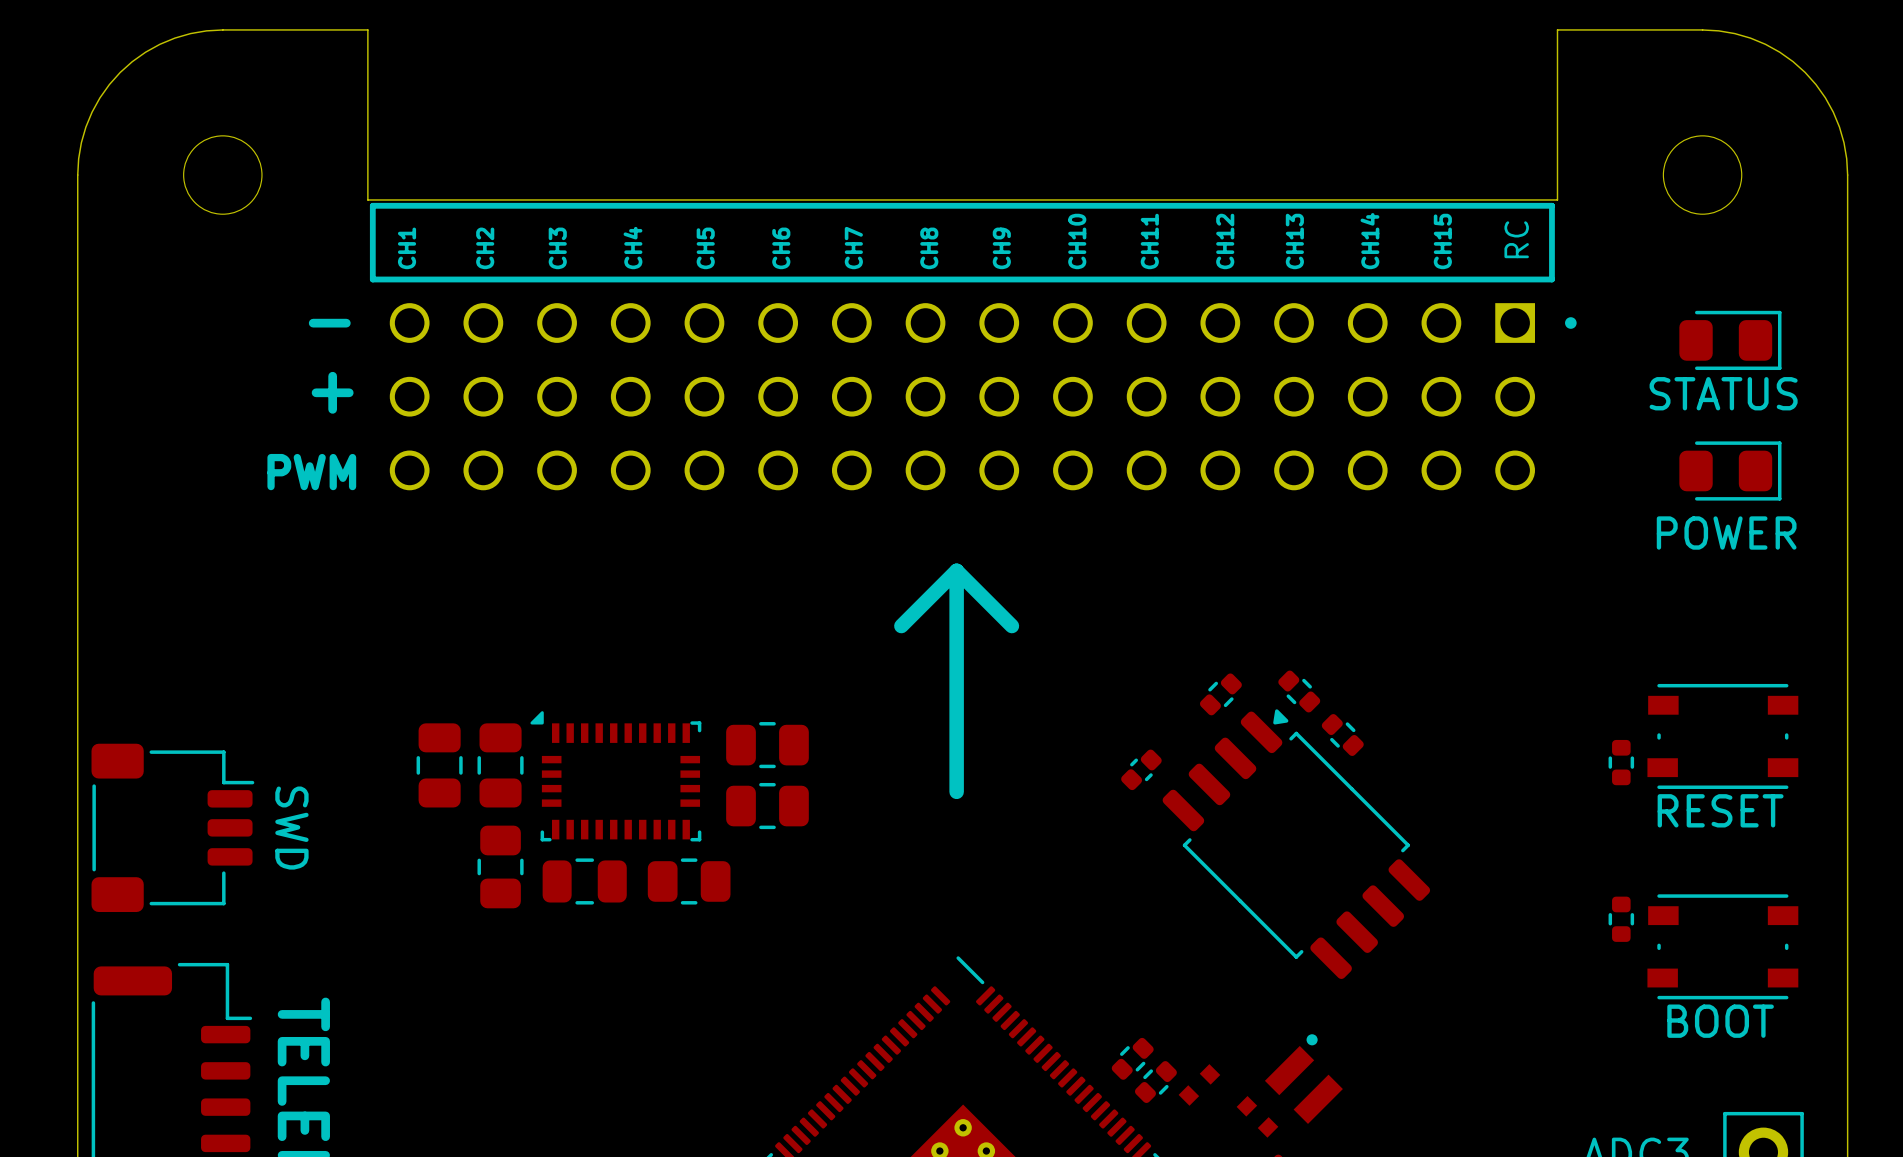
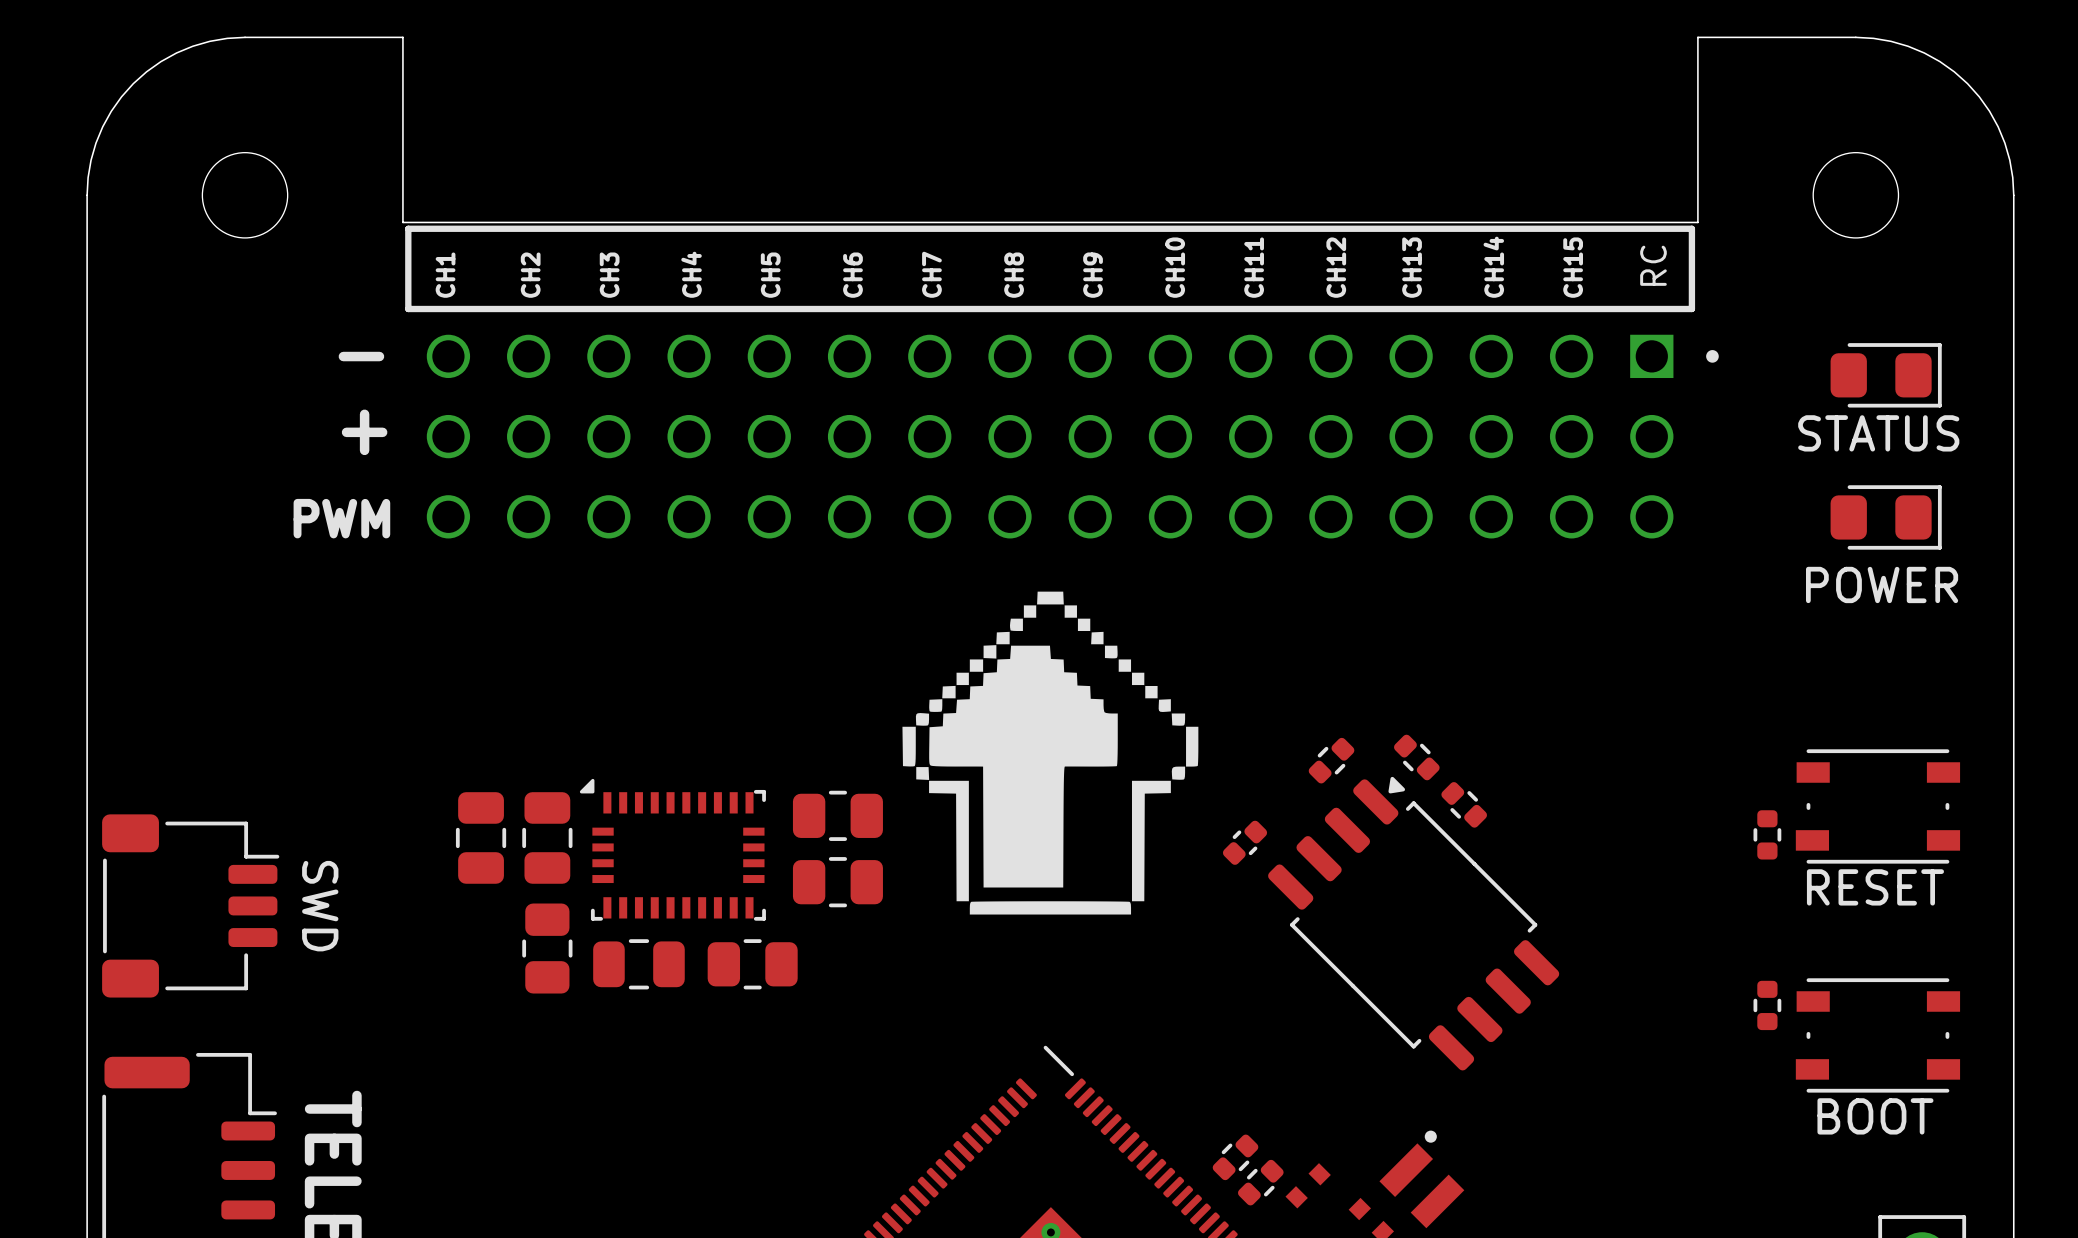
drawing: none -> [902, 591, 1199, 915]
text: ↑ (956, 681) -> none

